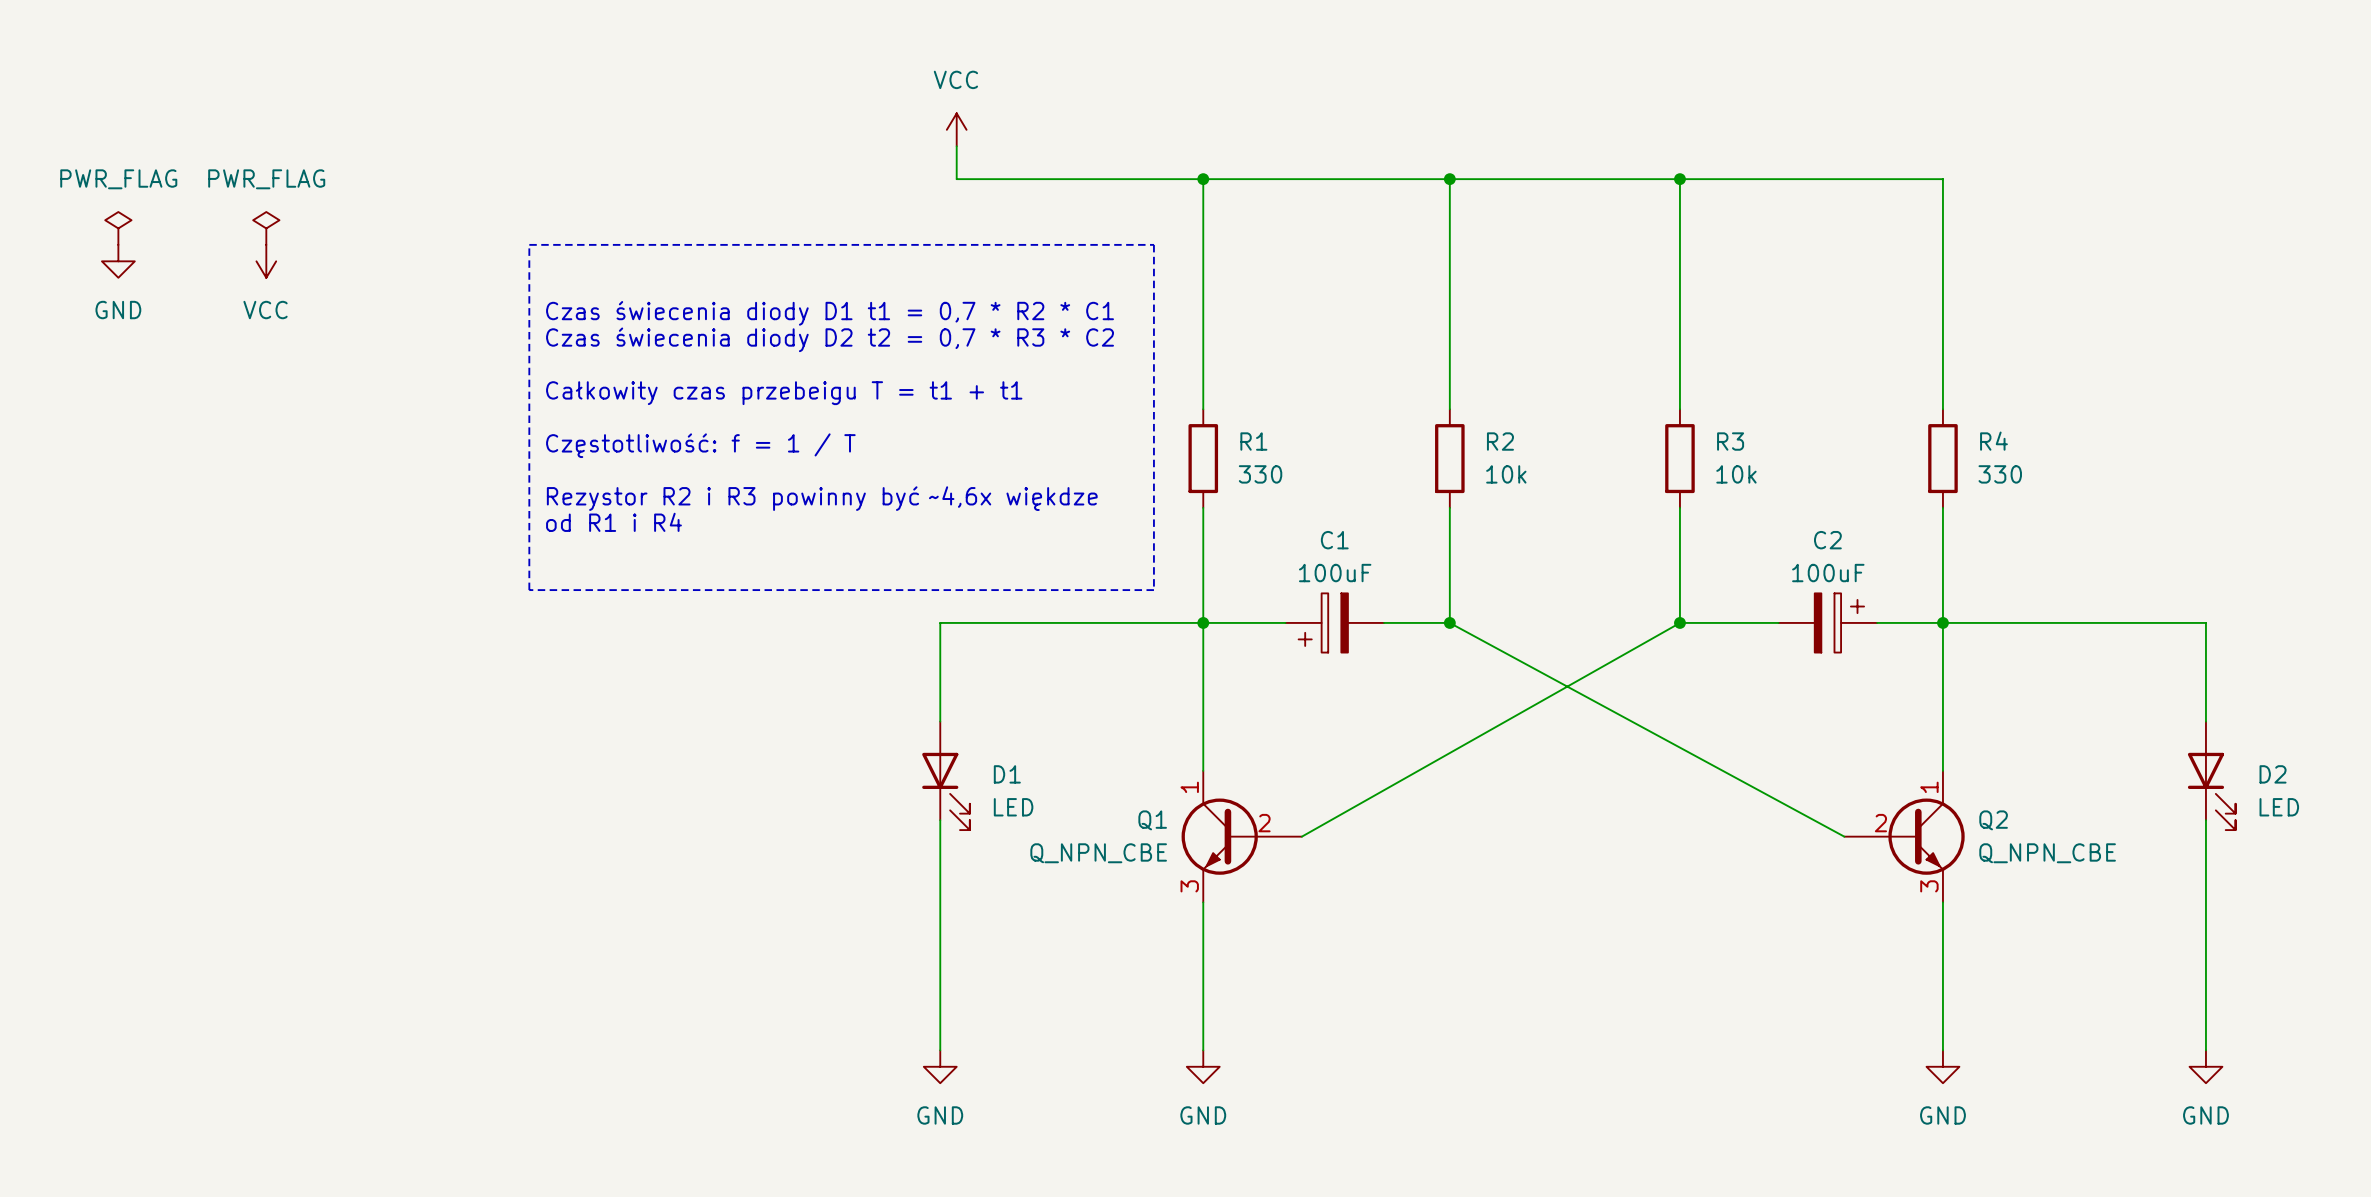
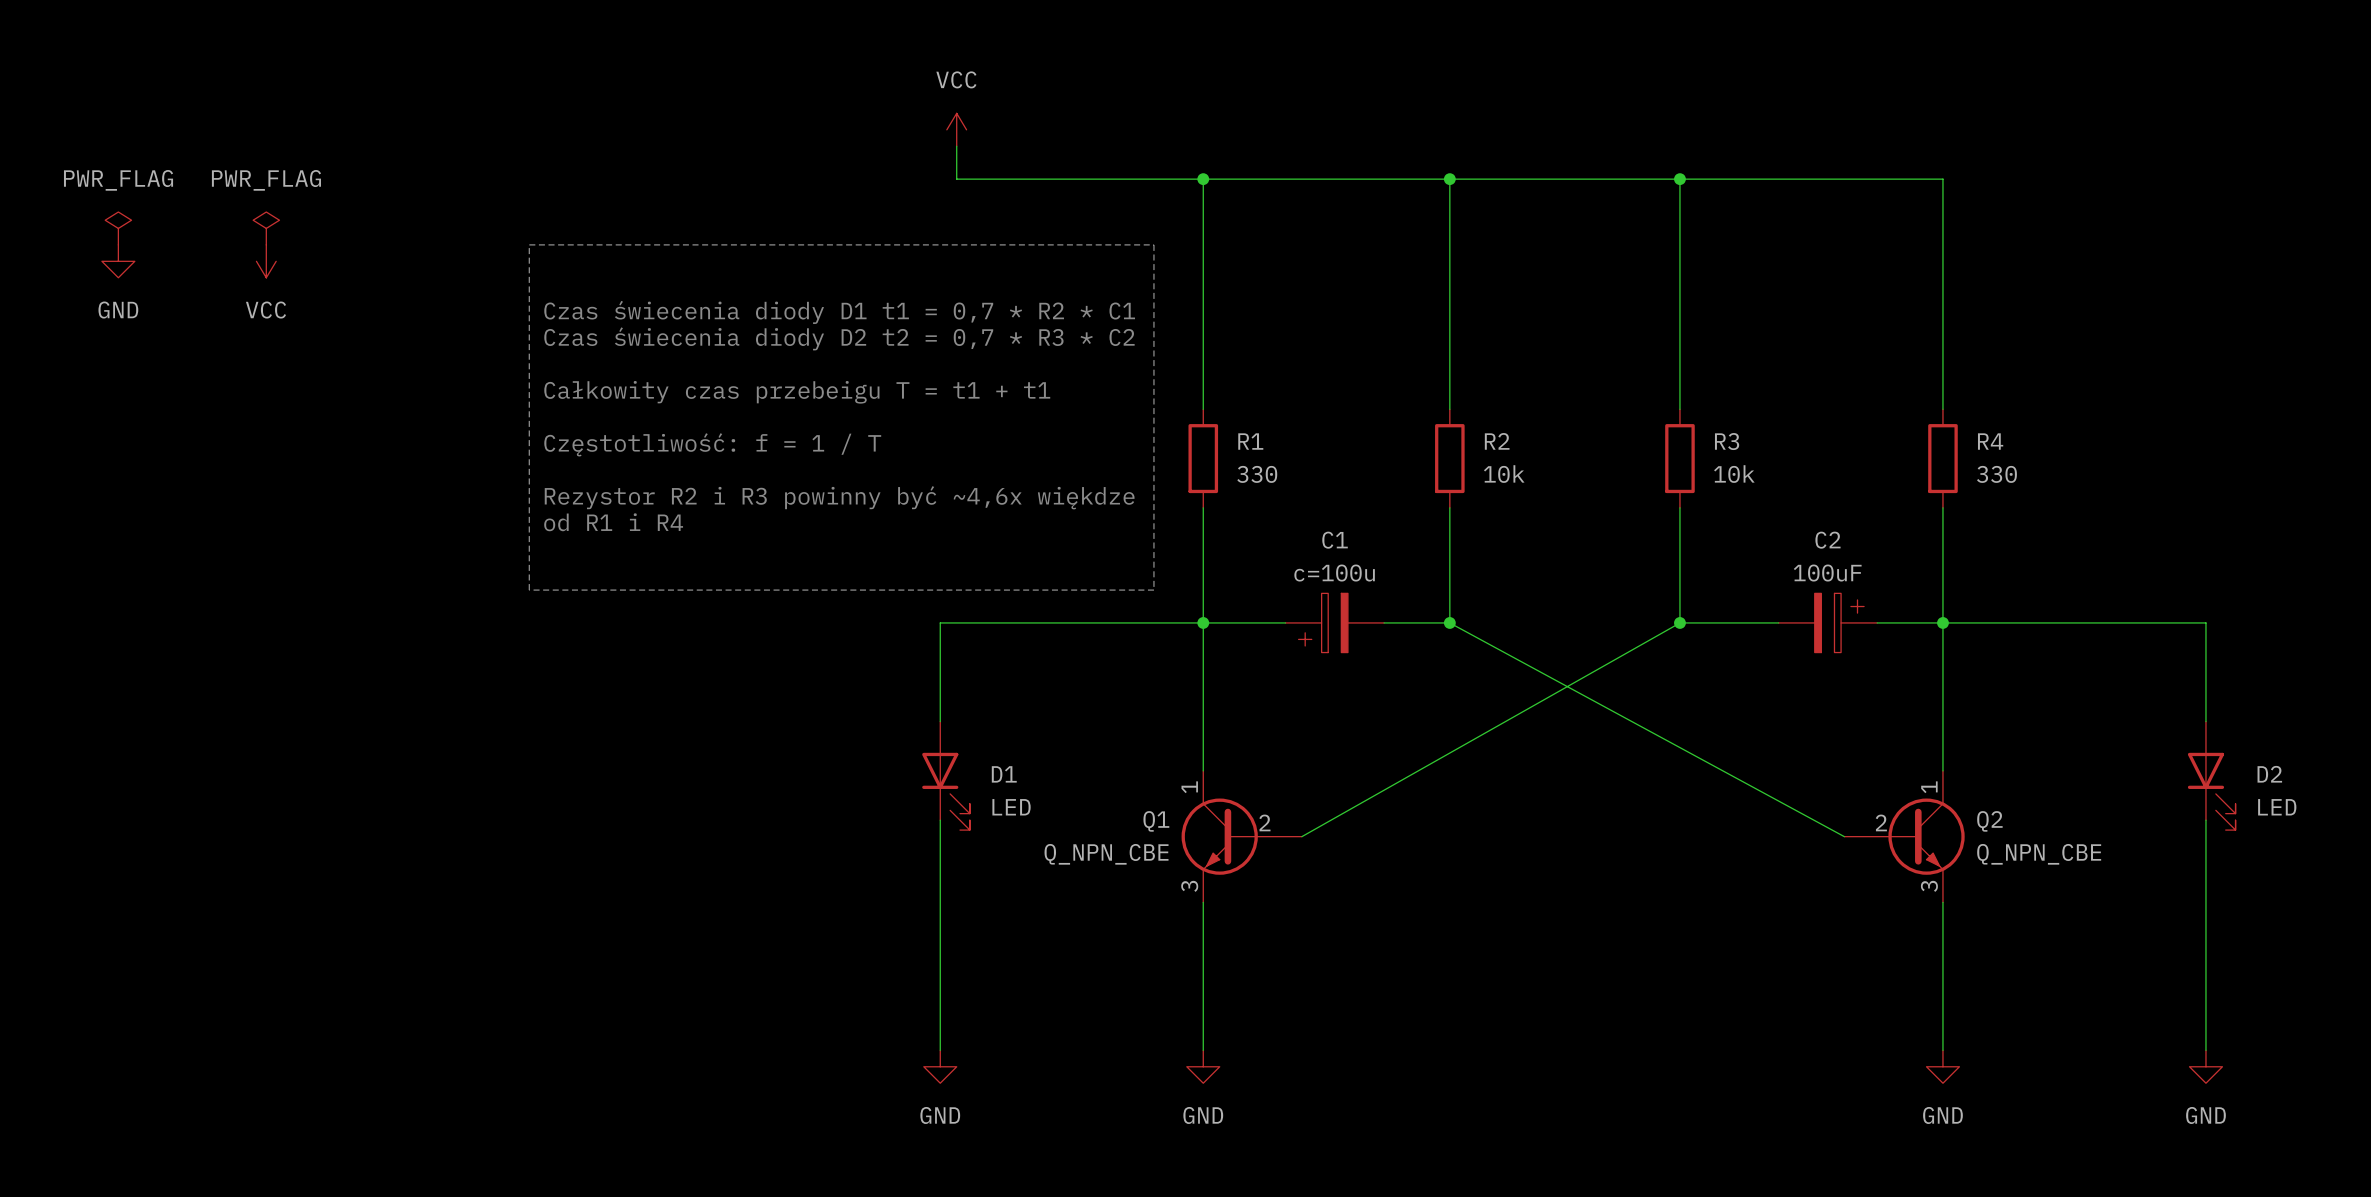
C1 value: 100uF (1335, 573) -> c=100u (1334, 573)

